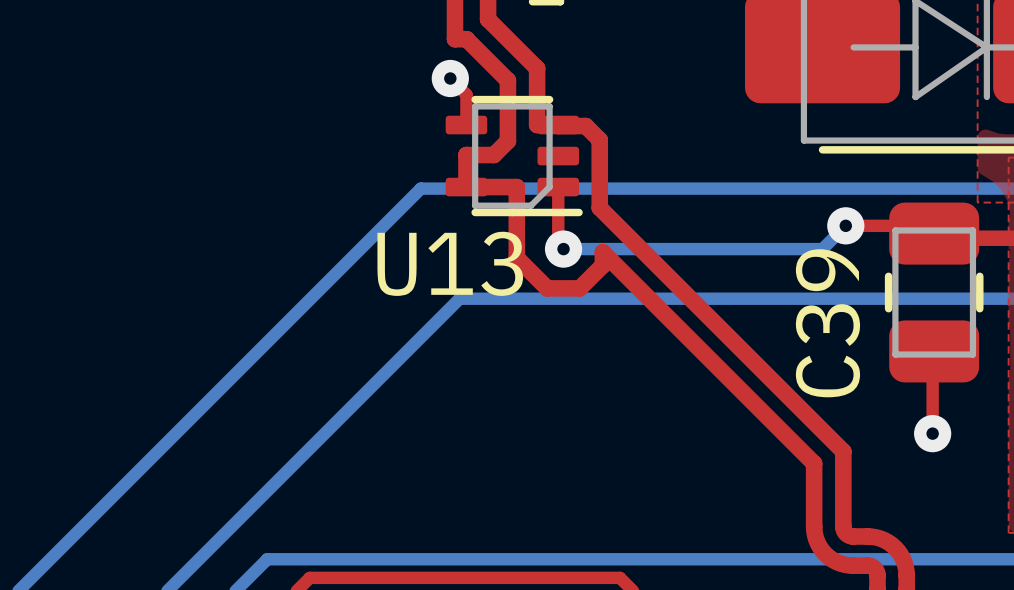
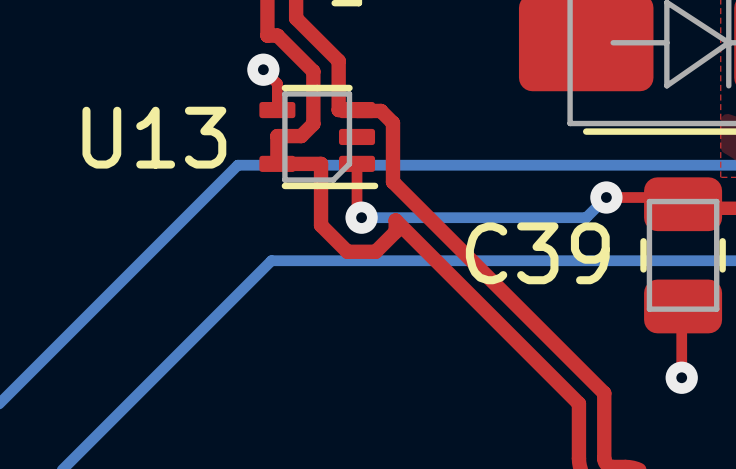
U13 name position: U13 (450, 263) -> U13 (154, 137)
C39 name rotation: 0° (827, 323) -> 90° clockwise (537, 253)

